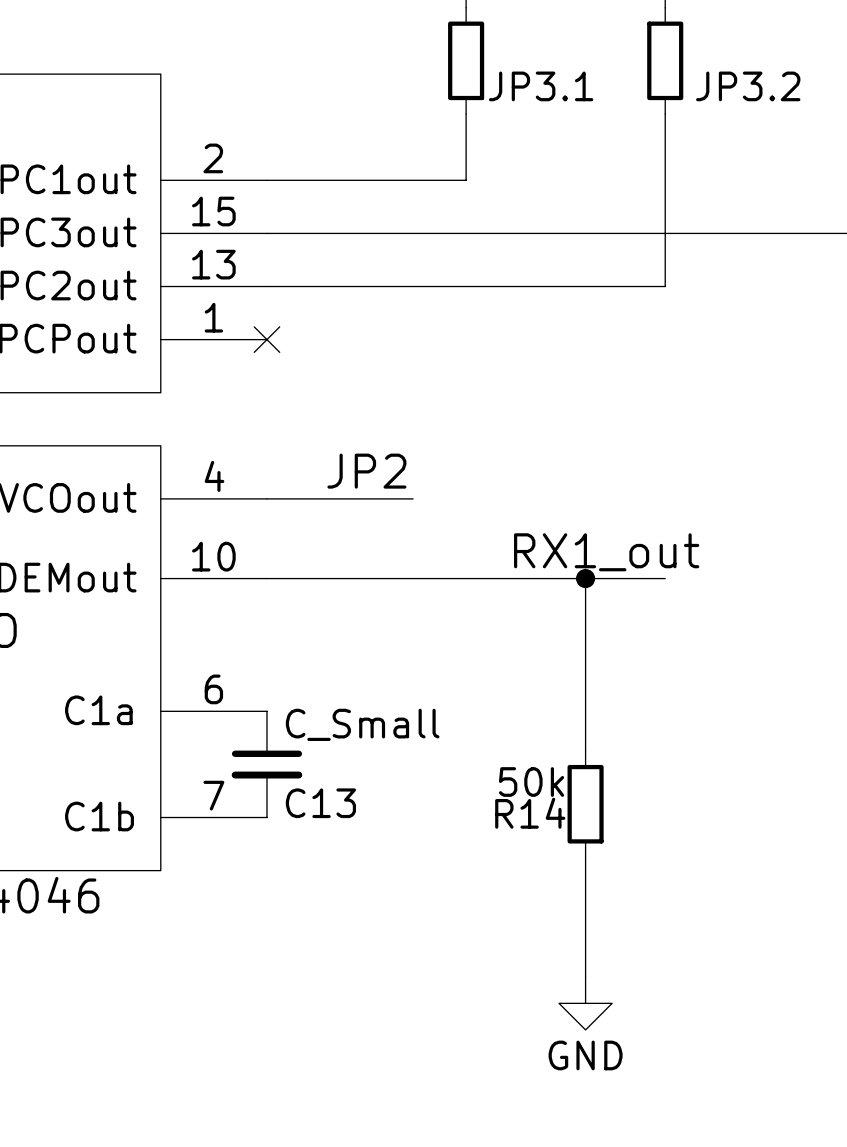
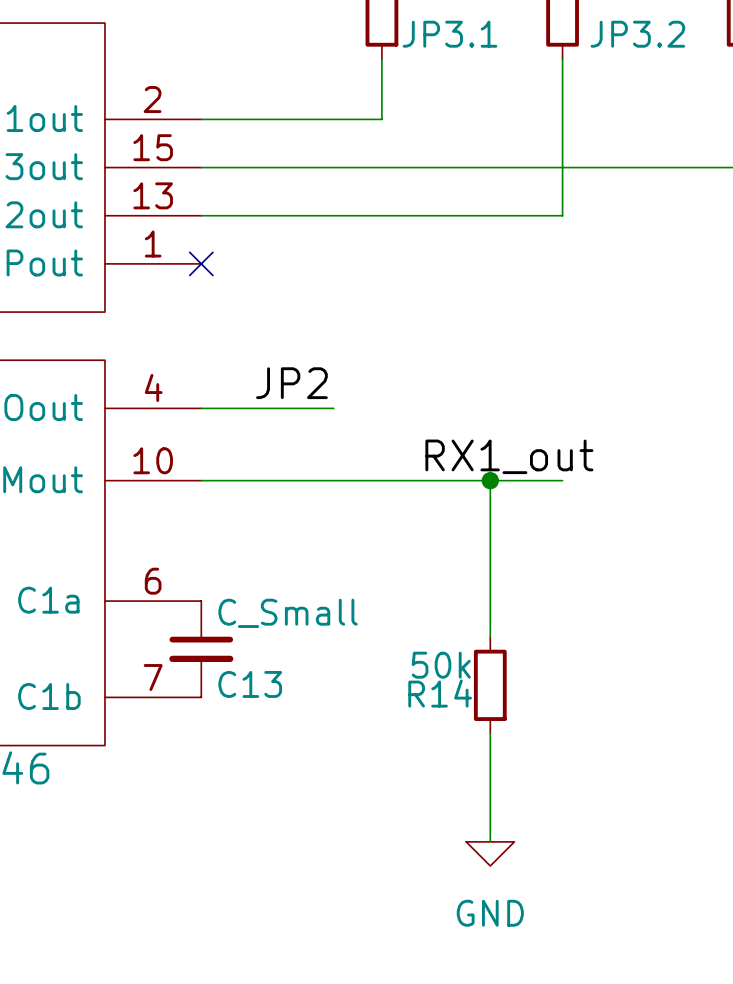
power symbol shape: [559, 976, 613, 1030] -> [466, 841, 515, 866]

